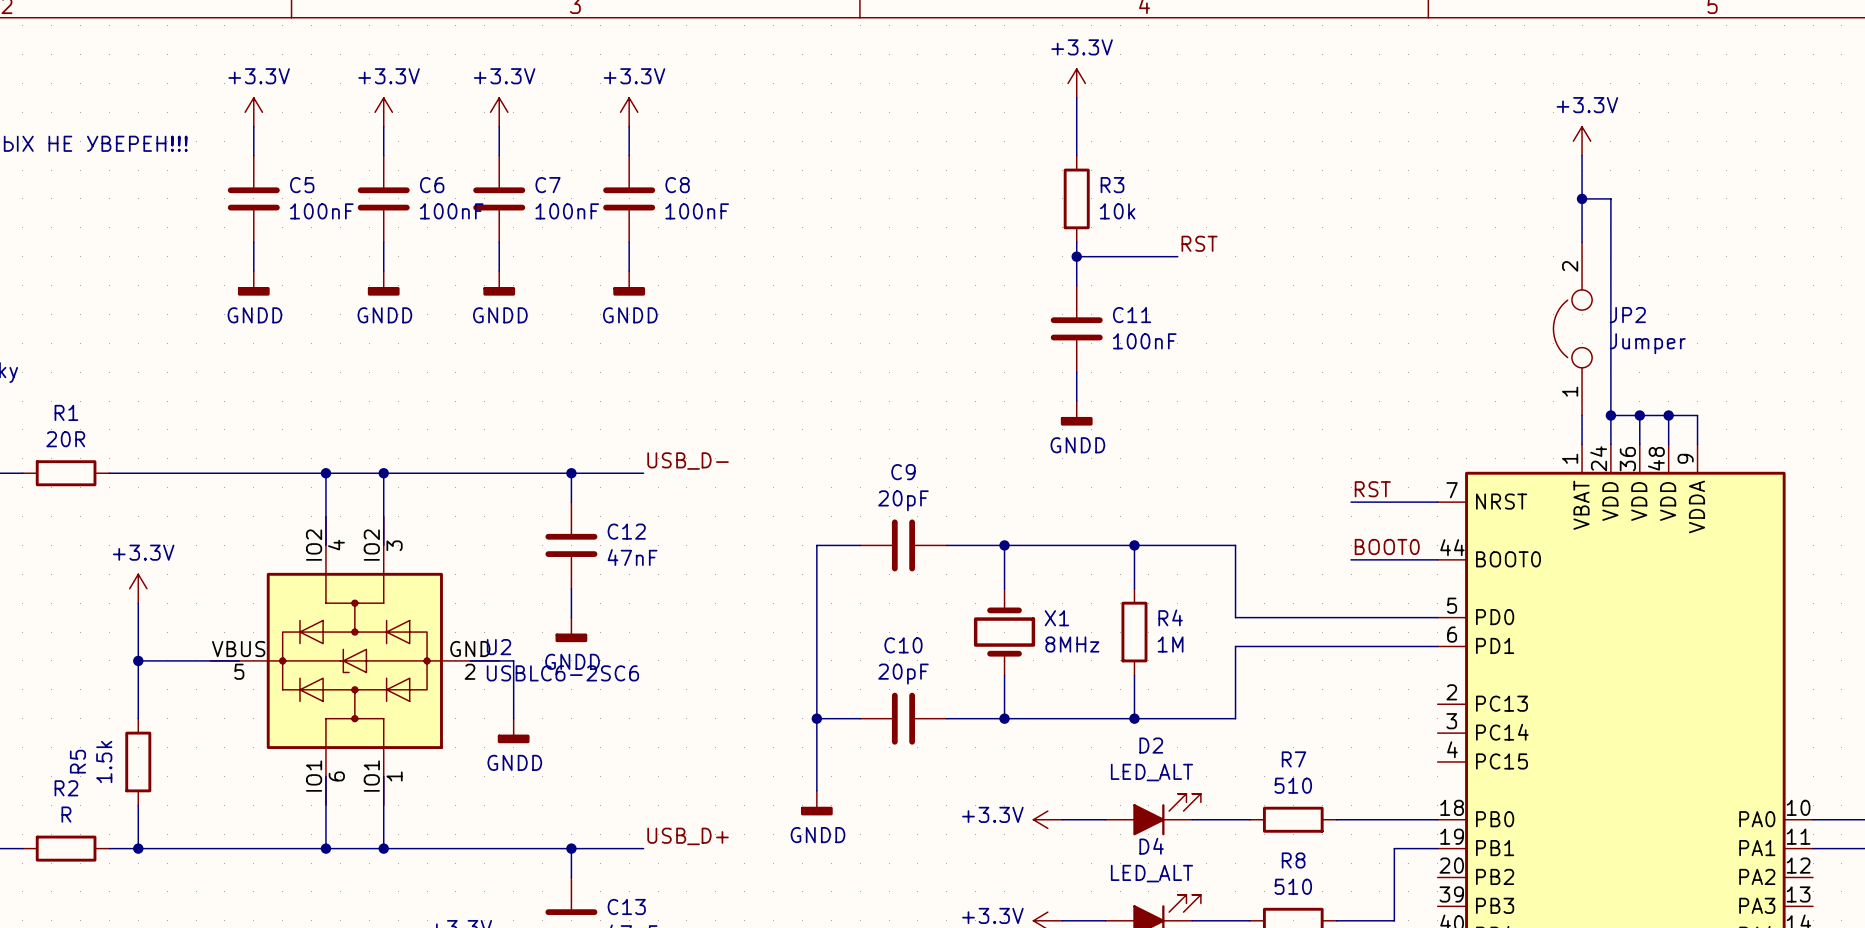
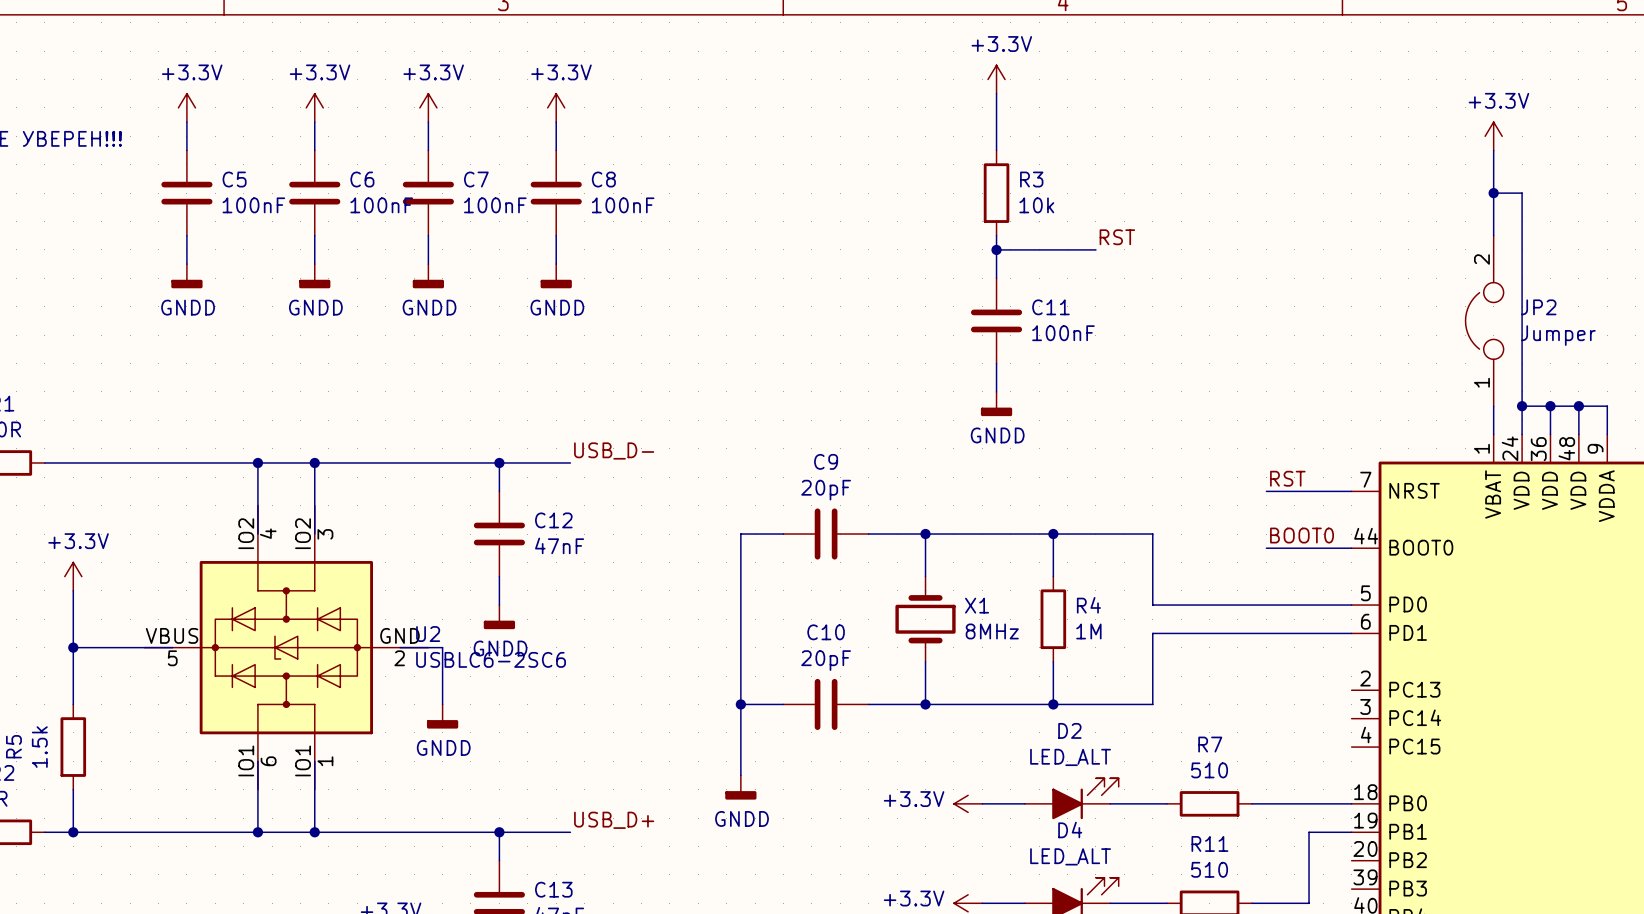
R8 name: R8 (1293, 860) -> R11 (1209, 843)

